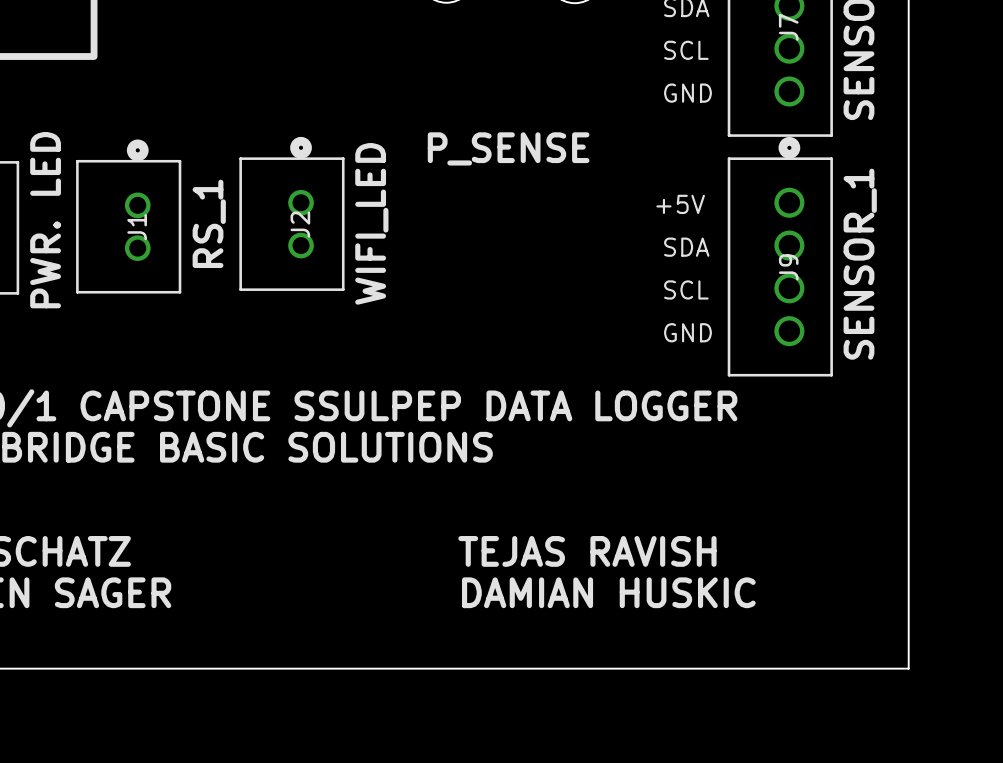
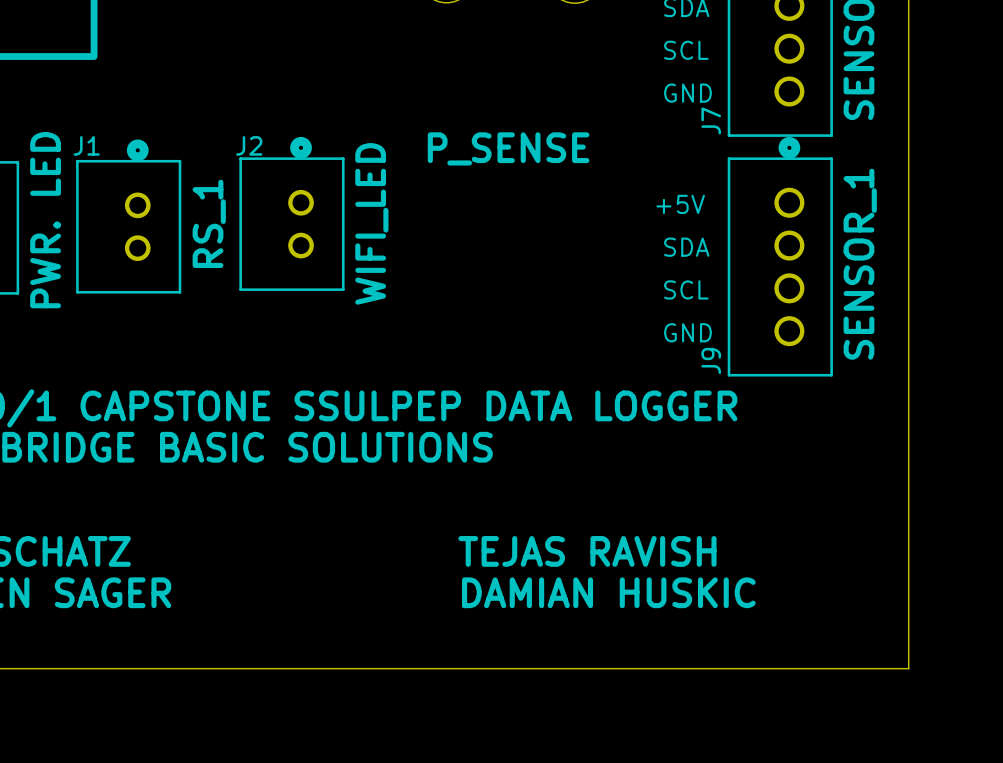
J7 name position: J7 (788, 27) -> J7 (711, 120)
J2 name rotation: 0° (300, 224) -> 90° clockwise (249, 145)
J2 name position: J2 (300, 224) -> J2 (249, 145)
J1 name rotation: 0° (137, 227) -> 90° clockwise (86, 145)
J1 name position: J1 (137, 227) -> J1 (86, 145)
J9 name position: J9 (788, 267) -> J9 (711, 360)

